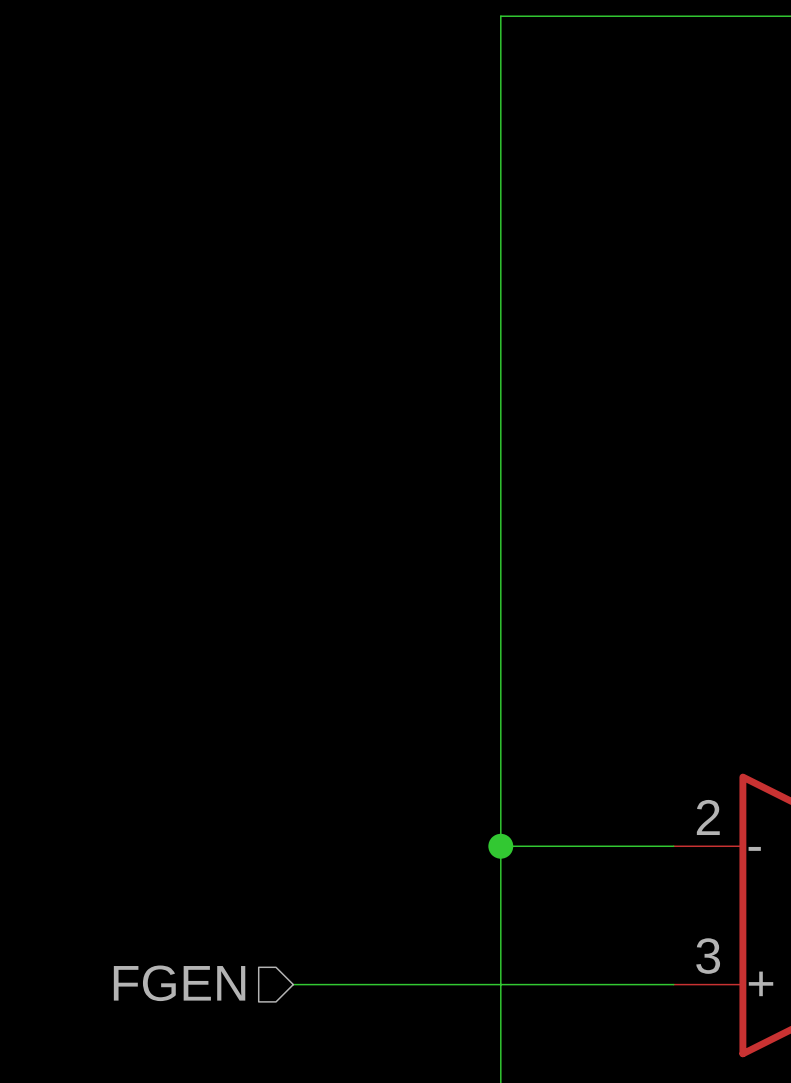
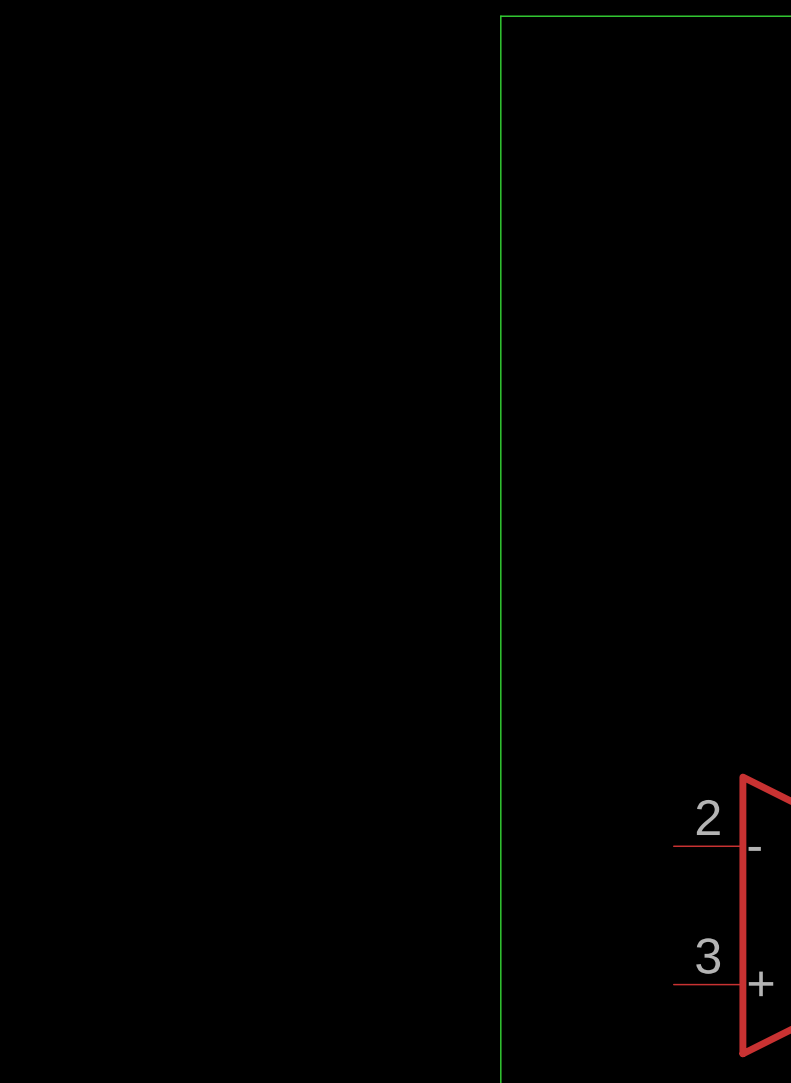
wire: (500, 846) (673, 846) -> none
junction: (500, 846) -> none
hierarchical label: FGEN (179, 983) -> none
wire: (293, 984) (673, 984) -> none

